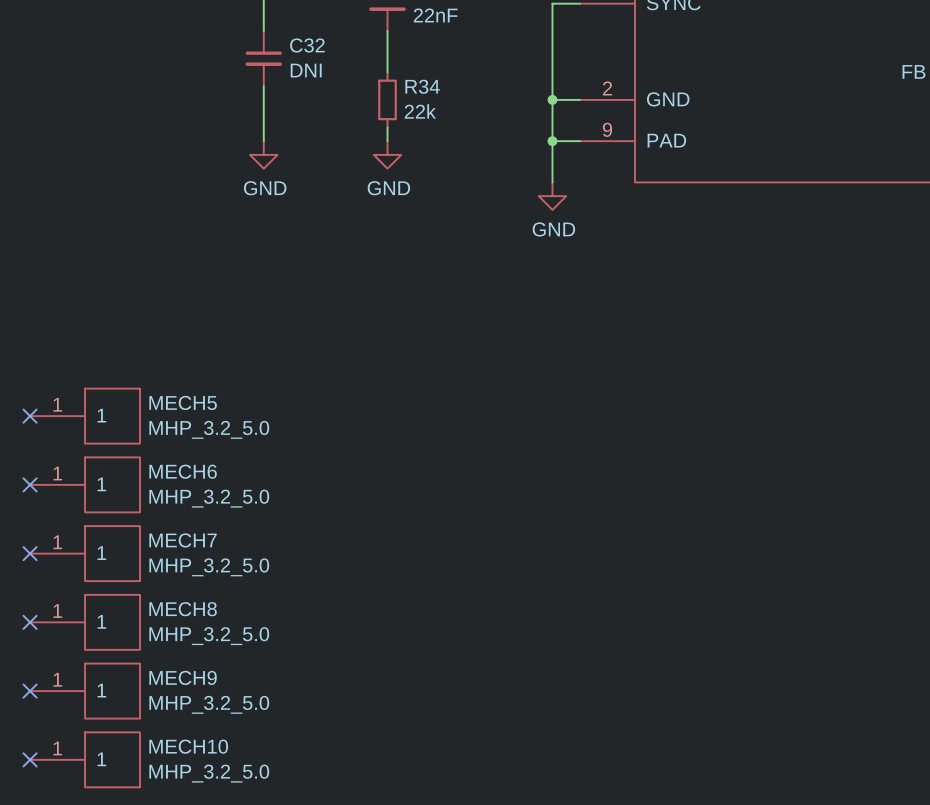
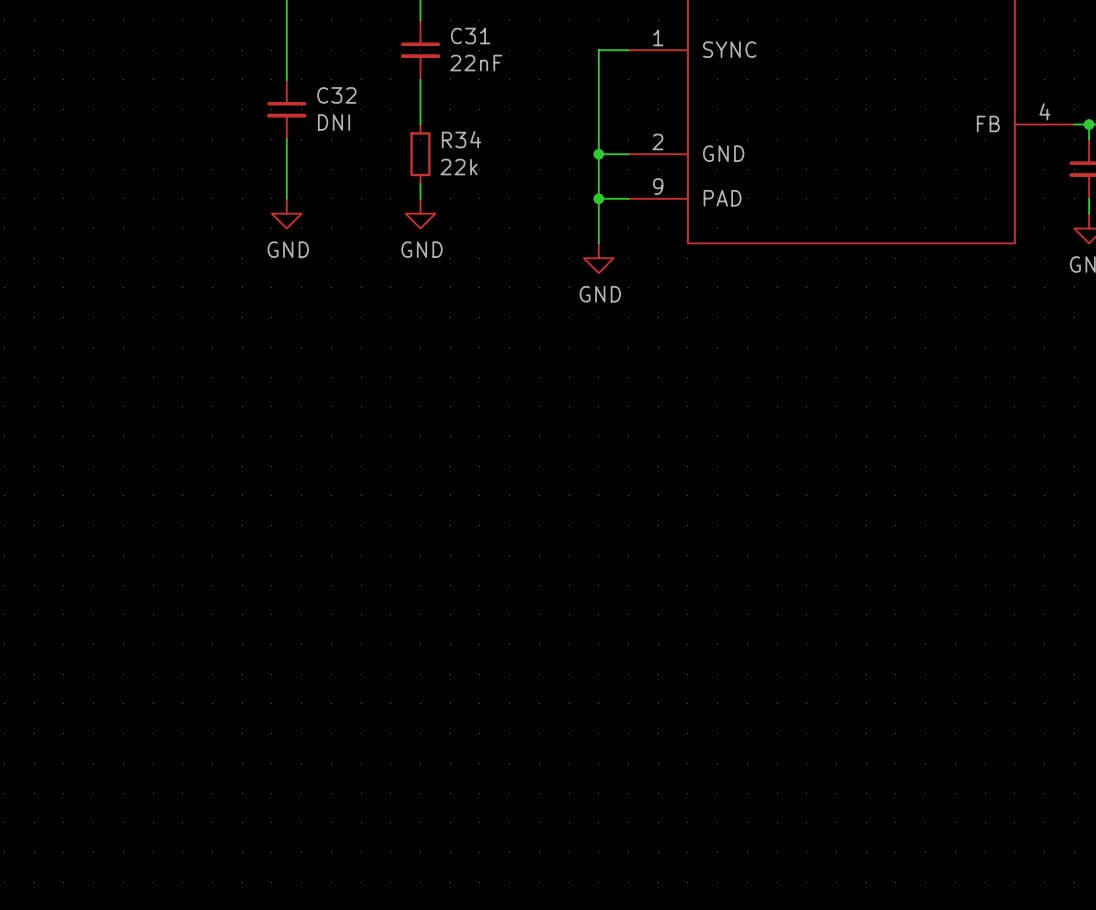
no-connect mark: (30, 416) -> none
MECH5: MHP_3.2_5.0 (85, 416) -> none
no-connect mark: (30, 484) -> none
MECH6: MHP_3.2_5.0 (85, 484) -> none
no-connect mark: (30, 553) -> none
MECH7: MHP_3.2_5.0 (85, 553) -> none
no-connect mark: (30, 622) -> none
MECH8: MHP_3.2_5.0 (85, 622) -> none
no-connect mark: (30, 691) -> none
MECH9: MHP_3.2_5.0 (85, 691) -> none
no-connect mark: (30, 759) -> none
MECH10: MHP_3.2_5.0 (85, 759) -> none

